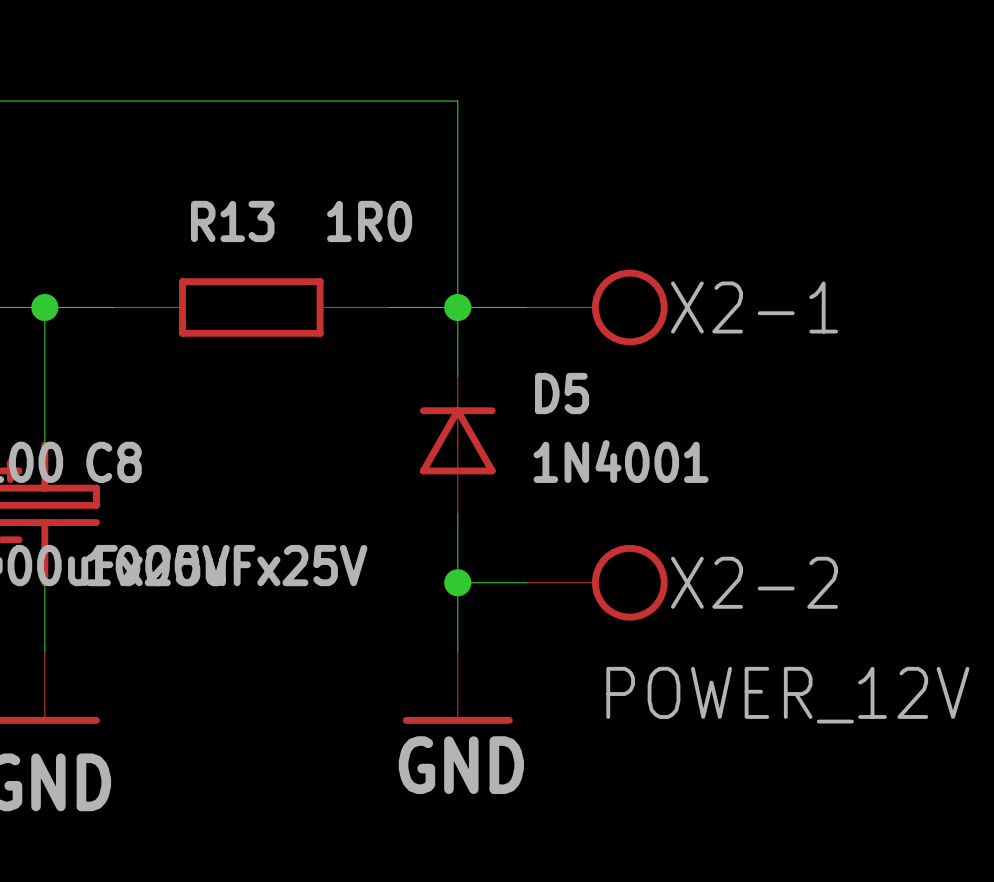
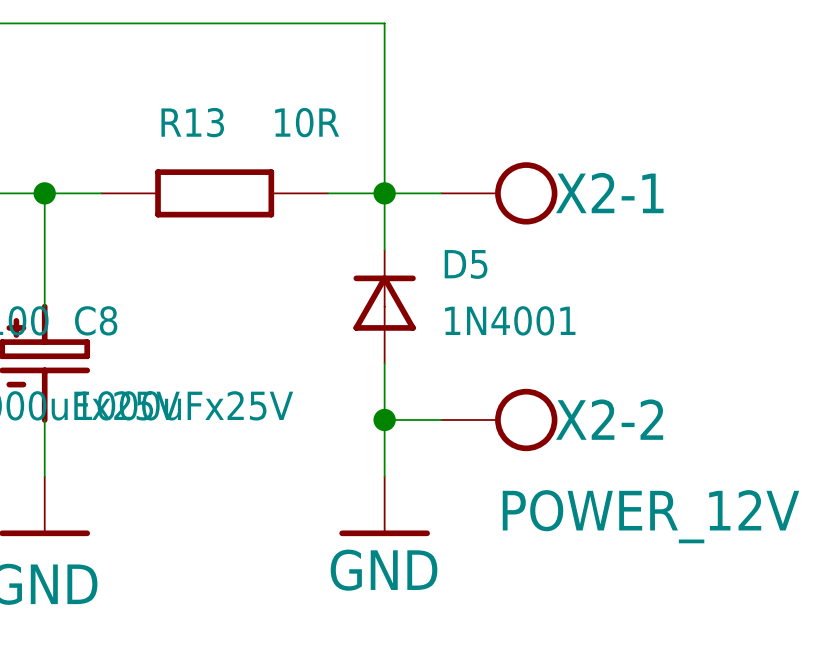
R13 value: 1R0 (369, 221) -> 10R (307, 122)

